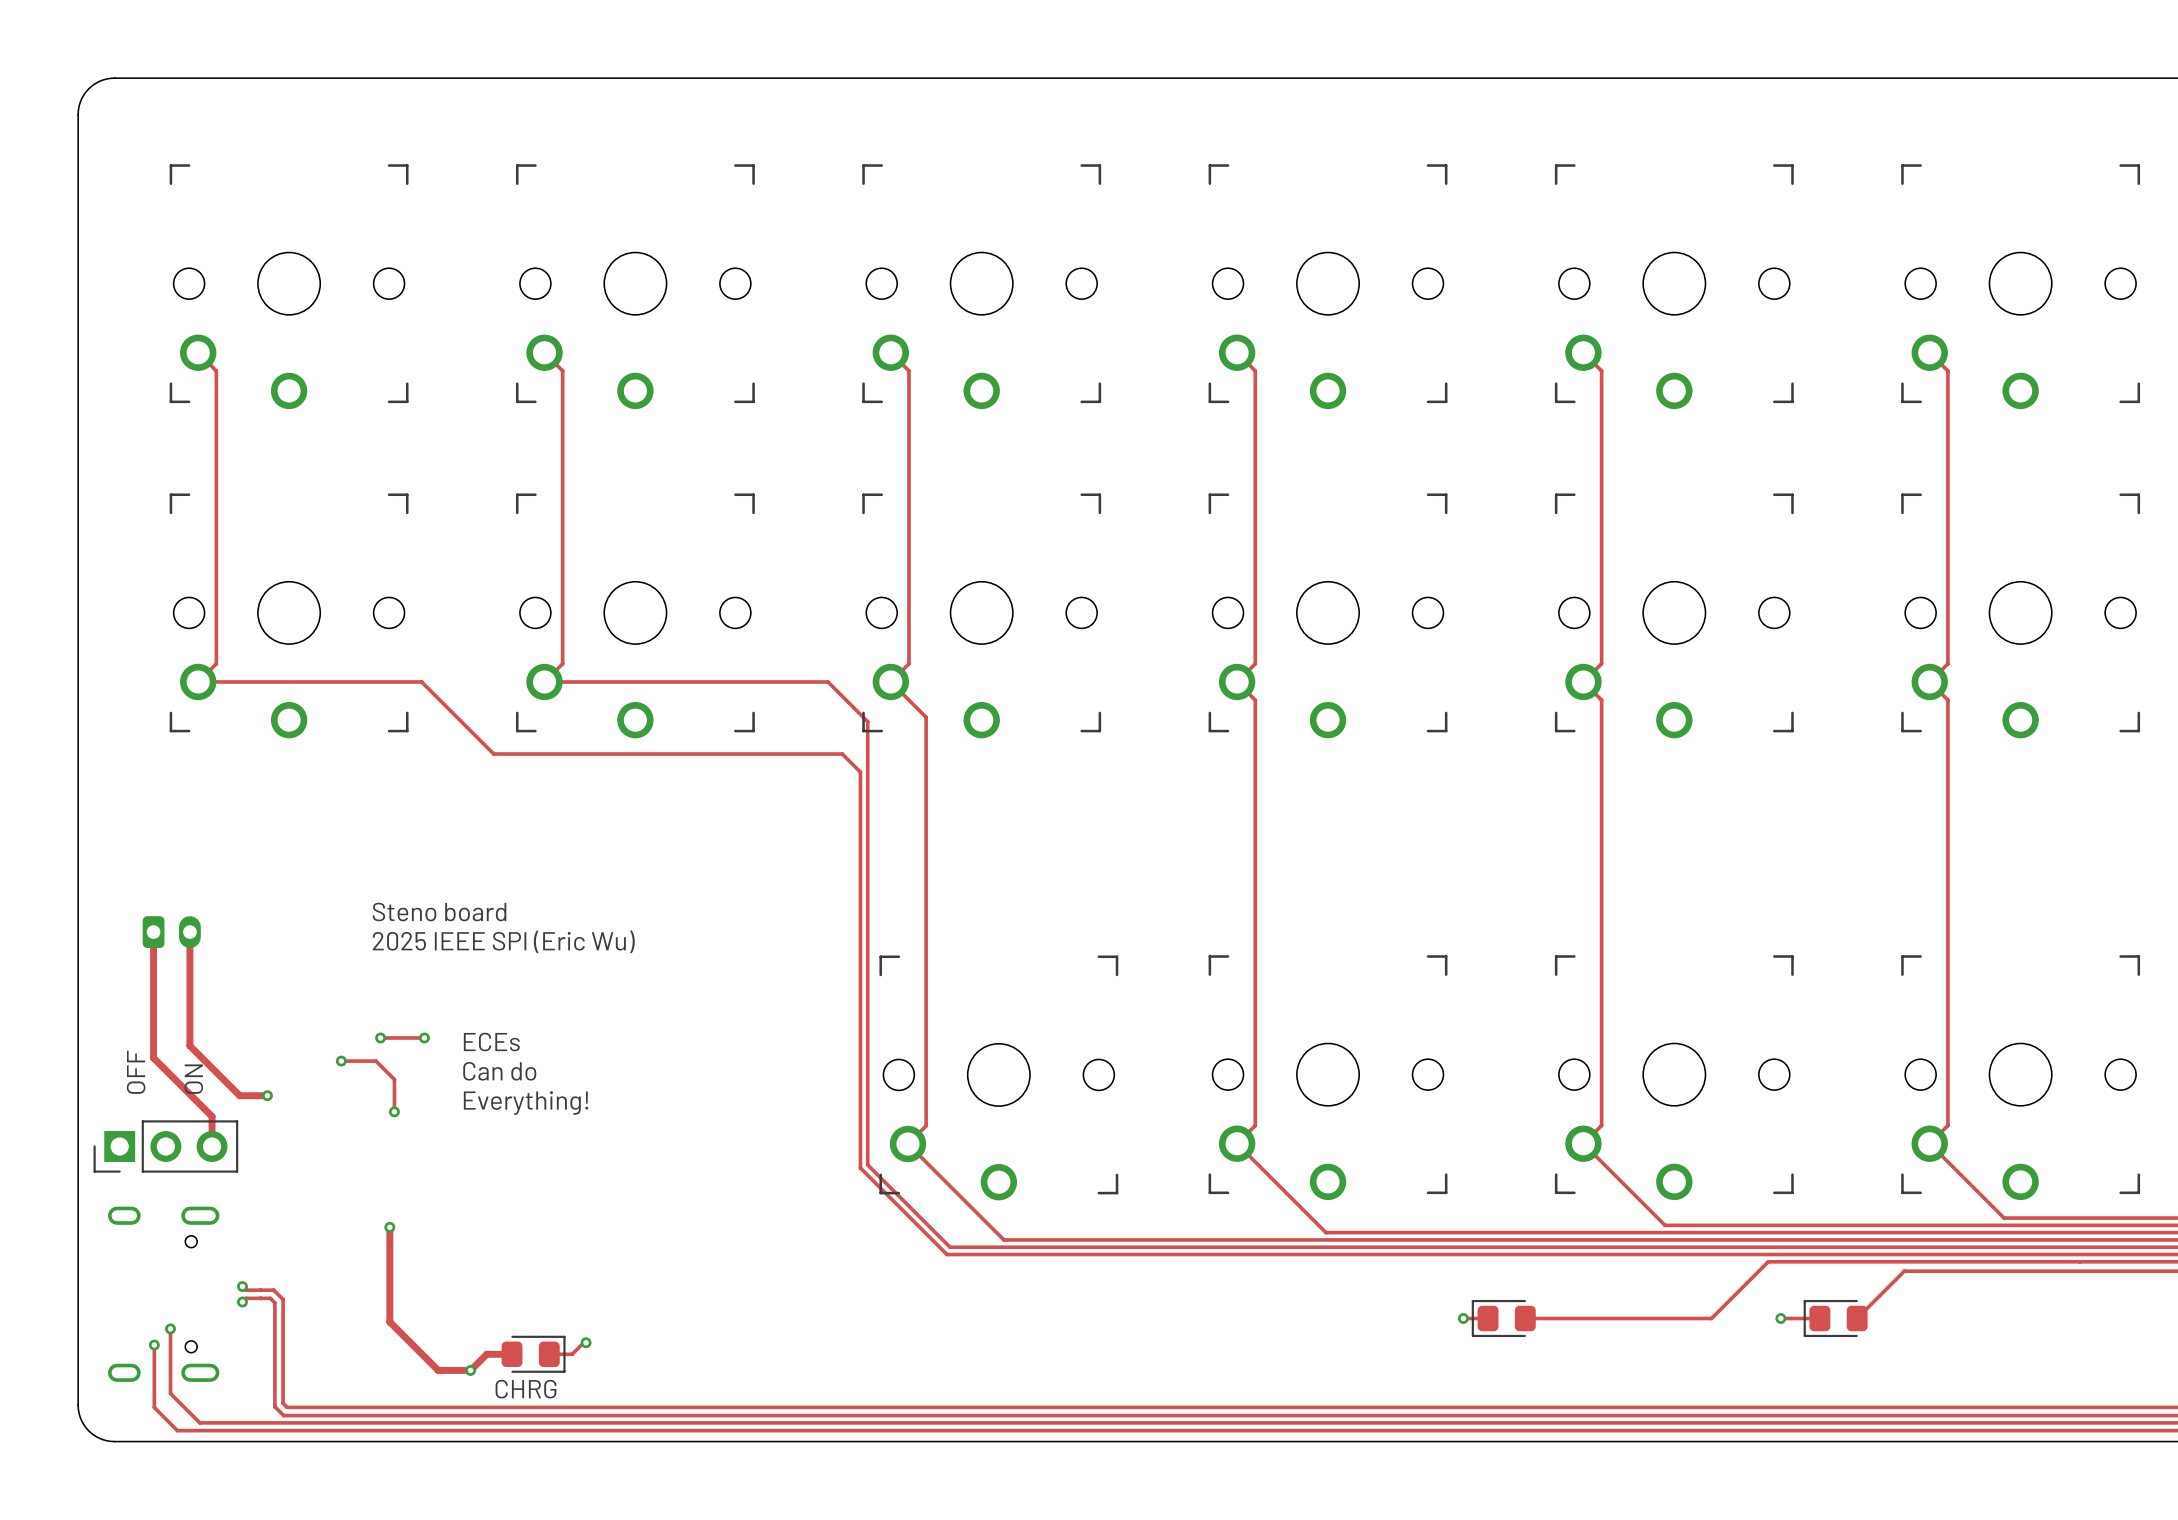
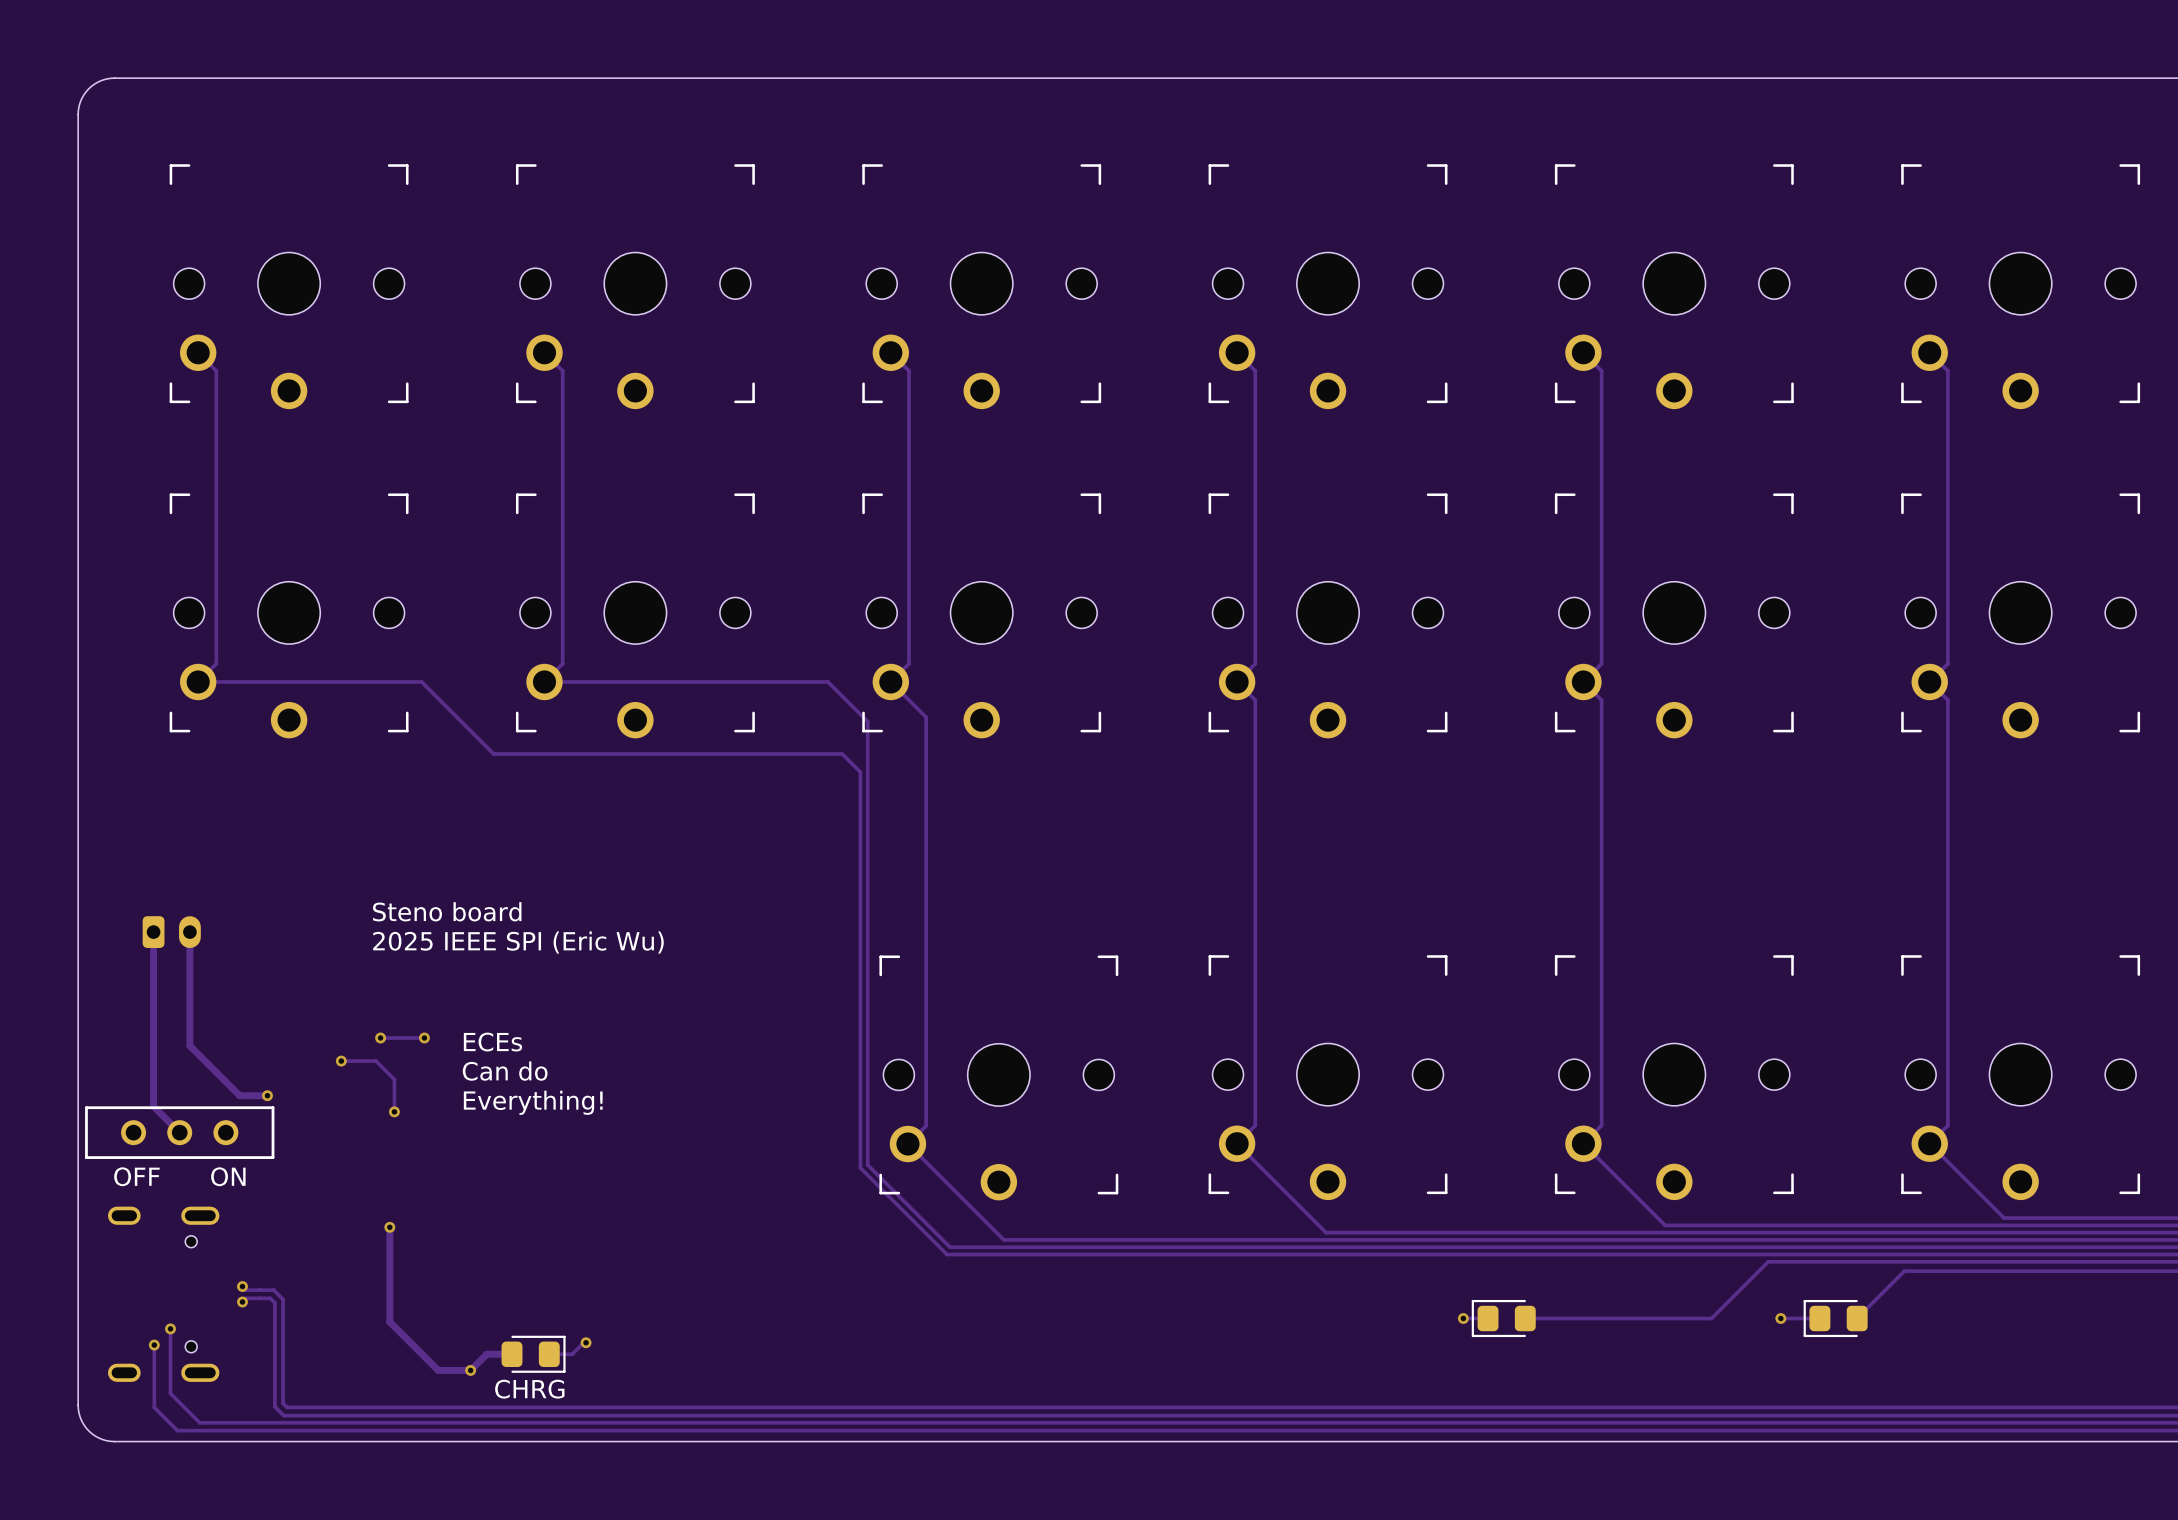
track: (153, 1058) (212, 1116) (212, 1146) -> (153, 1058) (153, 1106) (179, 1132)
text rotation: 0° (136, 1072) -> 90° clockwise (136, 1176)
text position: OFF (136, 1072) -> OFF (136, 1176)
text rotation: 0° (193, 1079) -> 90° clockwise (228, 1176)
text position: ON (193, 1079) -> ON (228, 1176)
part: none -> (179, 1132)
part: (165, 1146) -> none

